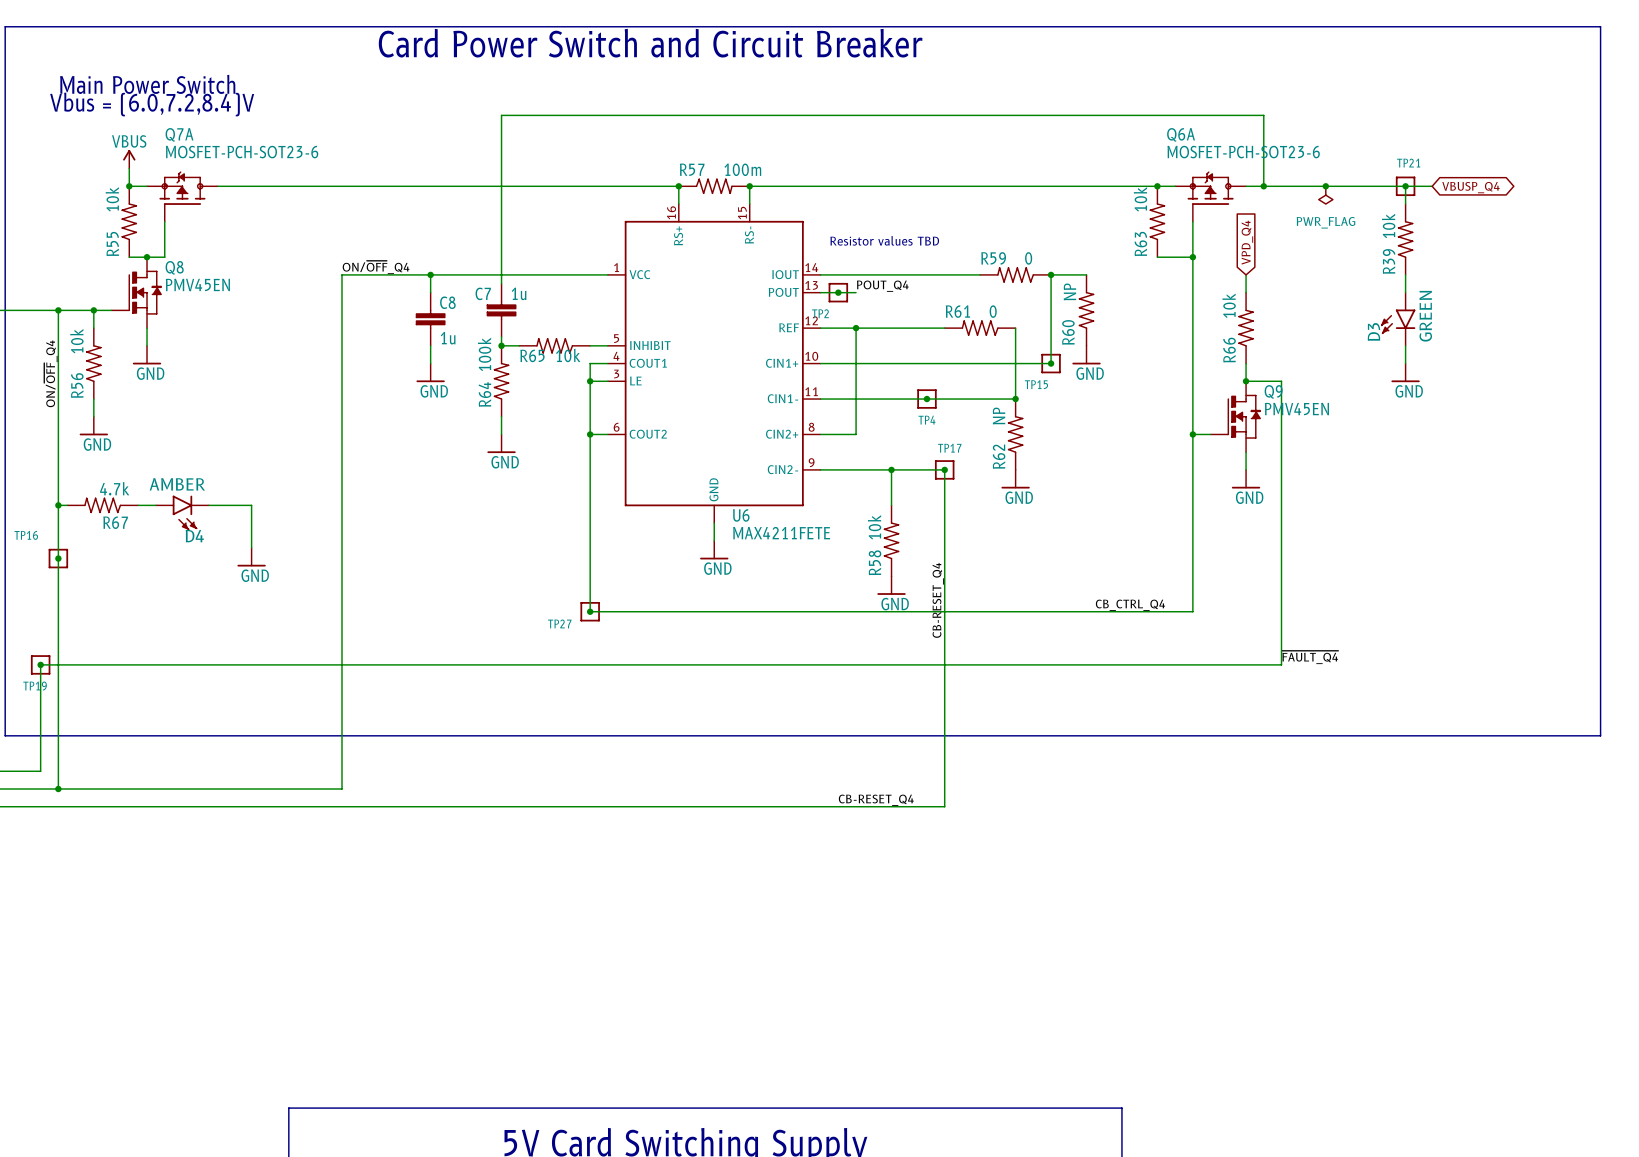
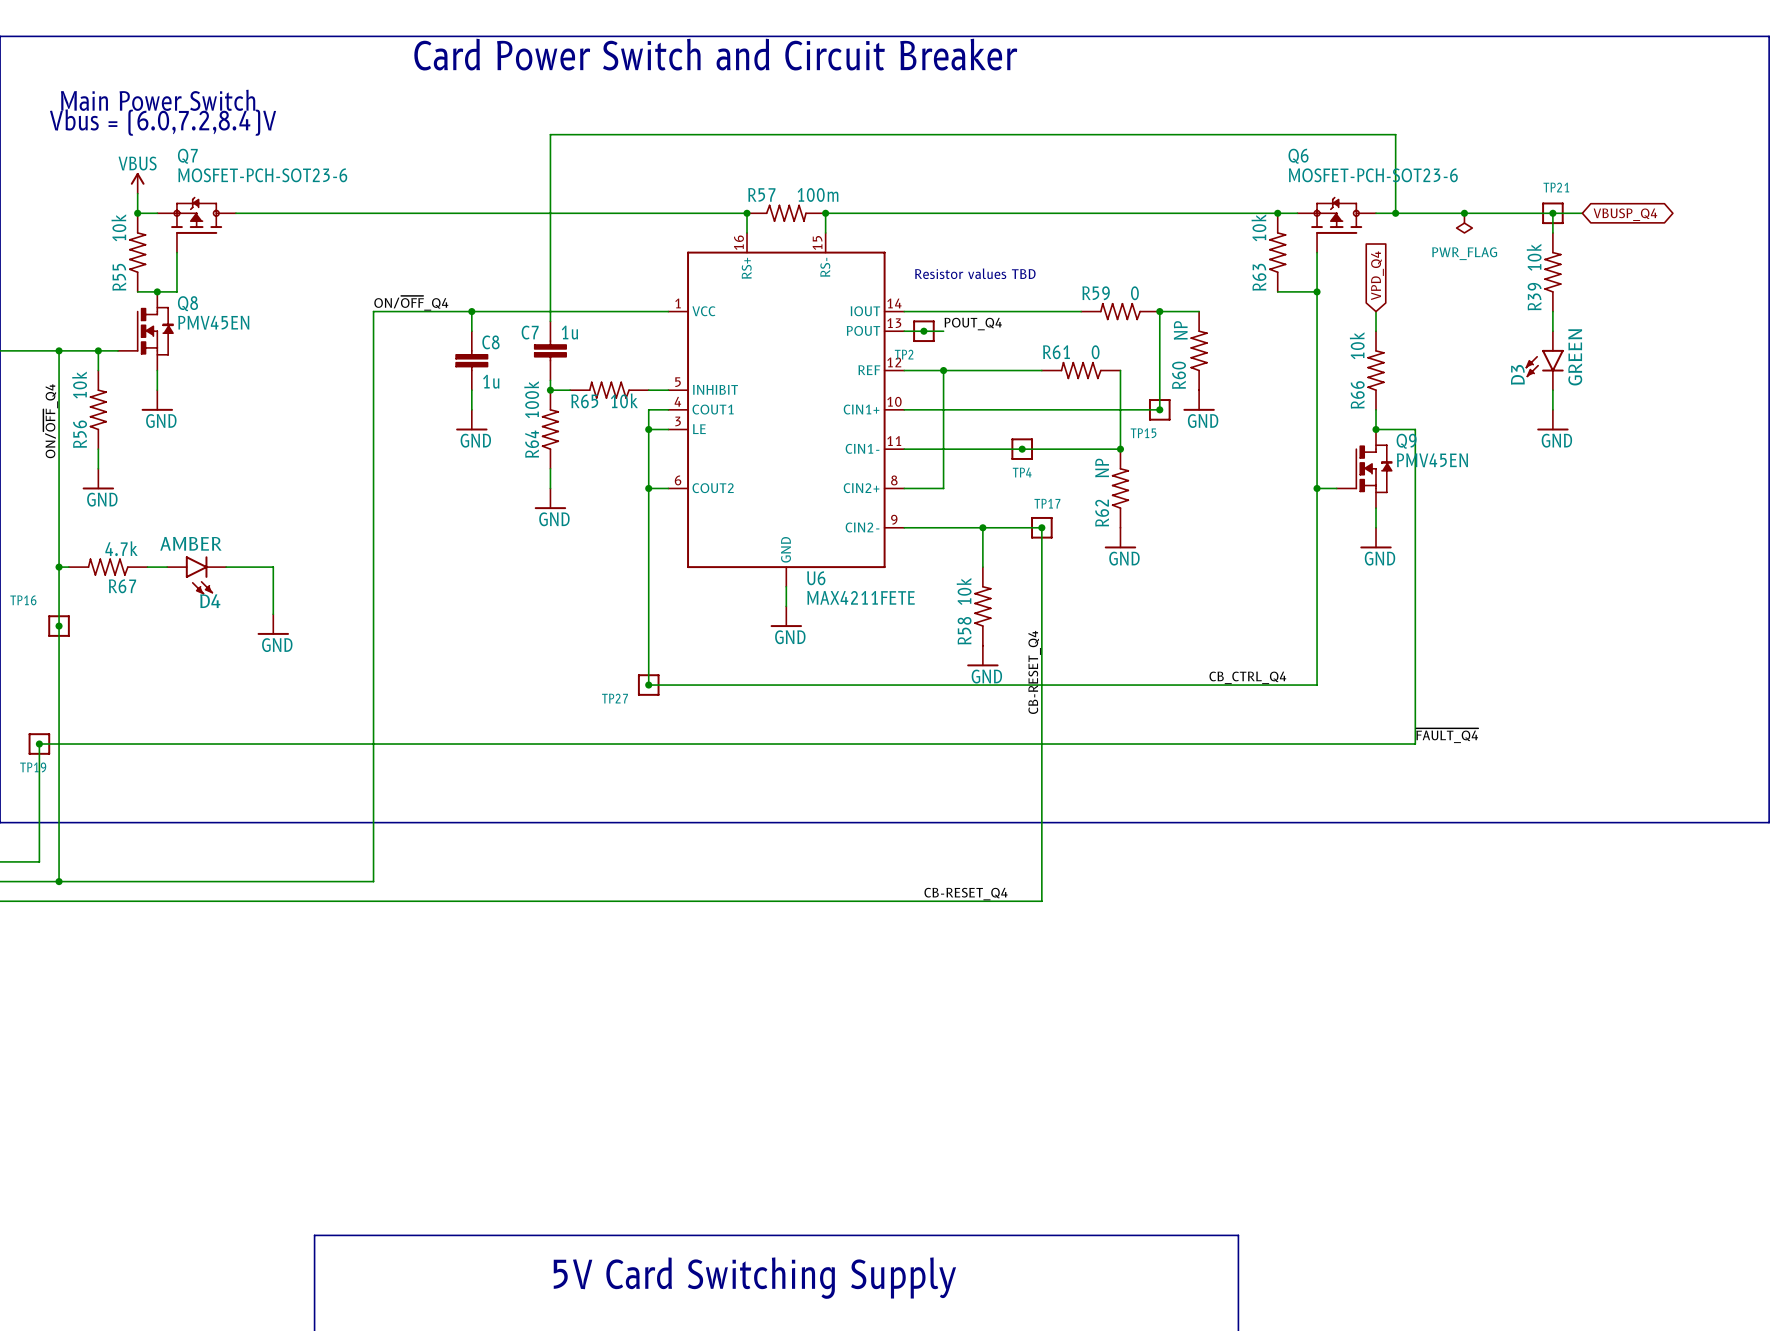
Q7A name: Q7A (179, 134) -> Q7 (187, 156)
Q6A name: Q6A (1181, 134) -> Q6 (1298, 156)

